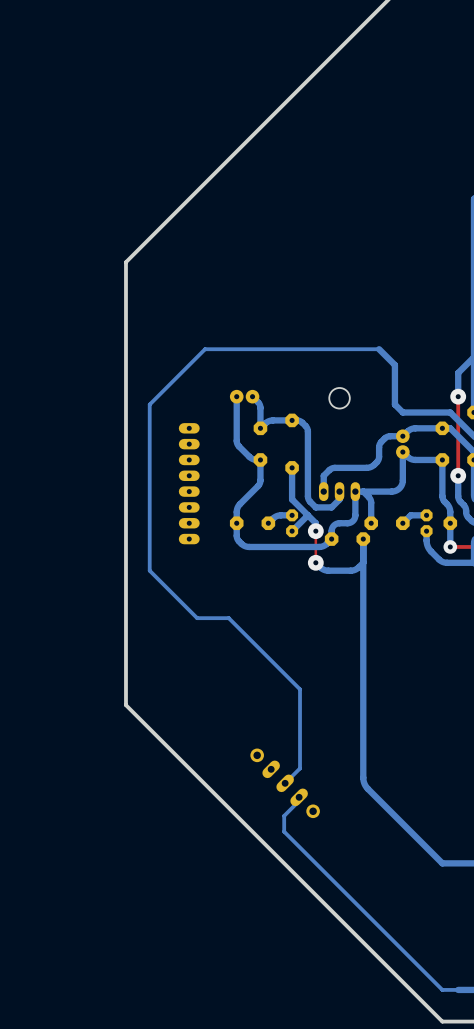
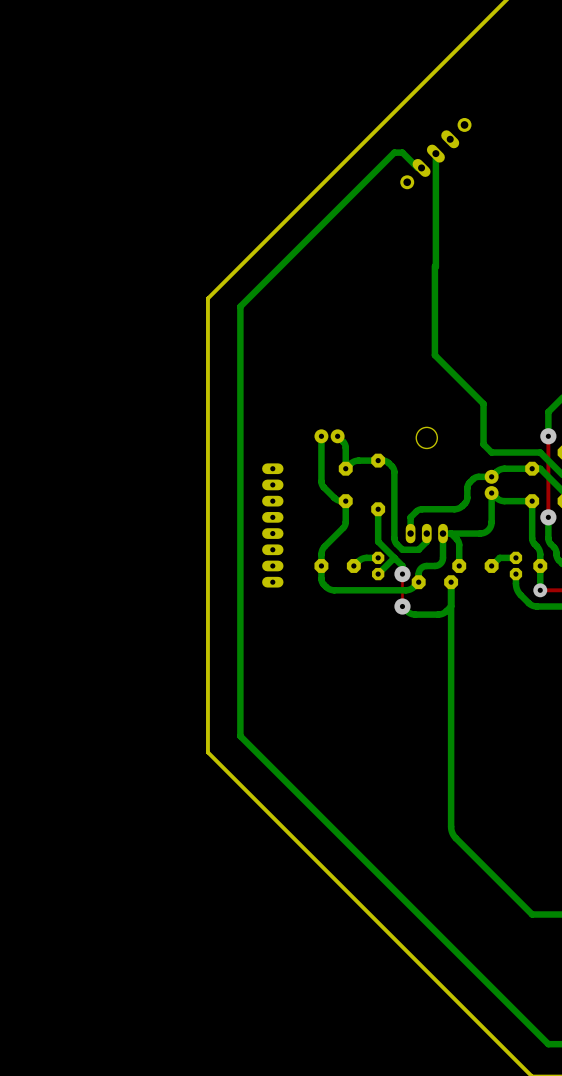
bottom track: none -> (435, 153) (435, 267)
part: none -> (435, 153)
bottom track: (379, 349) (205, 349) (149, 404) (149, 570) (197, 618) (228, 618) (300, 689) (300, 768) (285, 783) -> (467, 387) (434, 355) (434, 266)
part: (285, 783) -> none
bottom track: (299, 797) (300, 800) (284, 815) (284, 831) (442, 989) (458, 989) -> (421, 167) (417, 167) (402, 152) (394, 152) (240, 306) (240, 736) (548, 1044)

